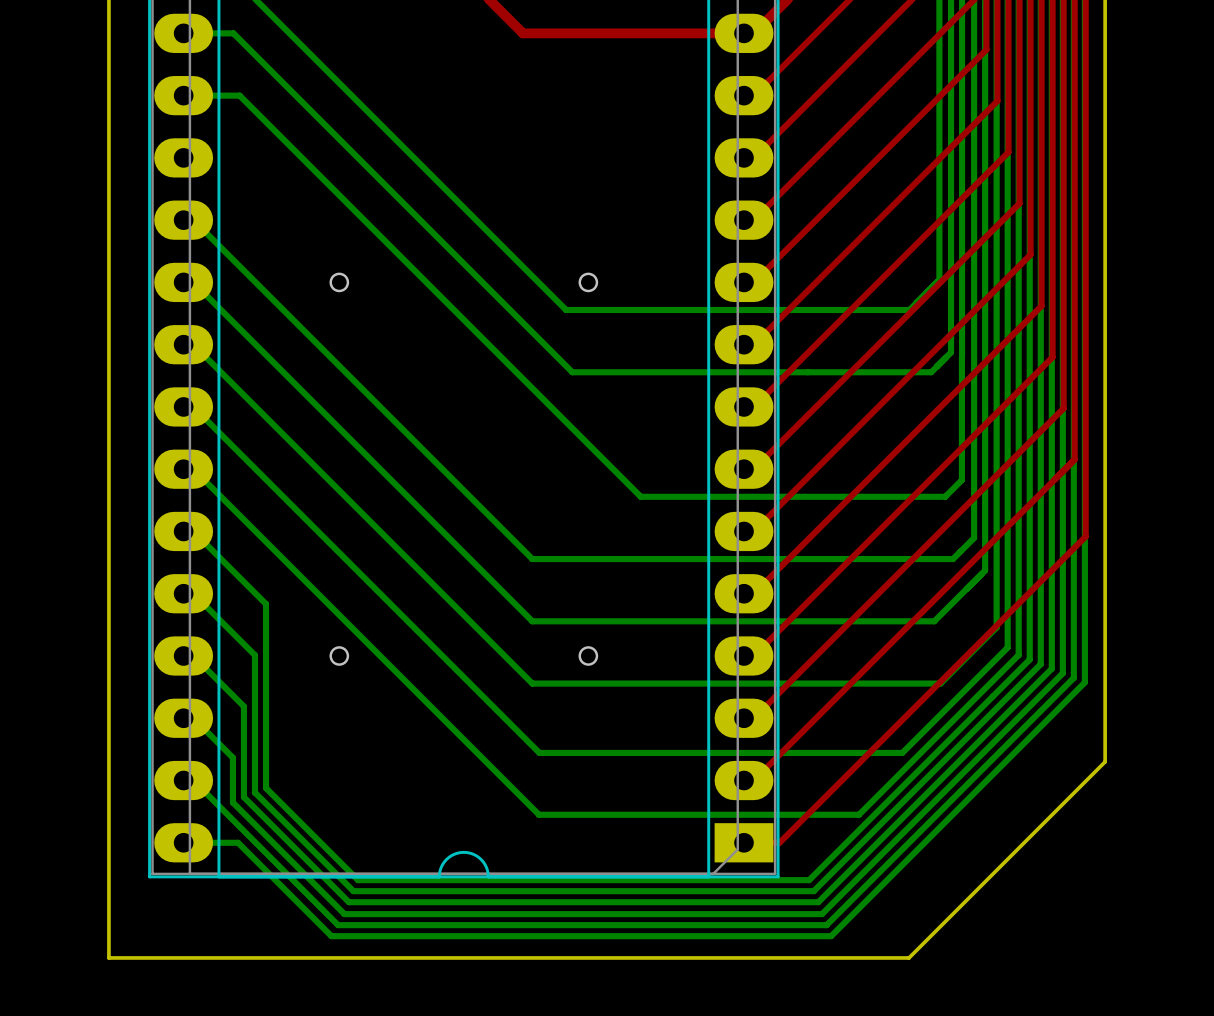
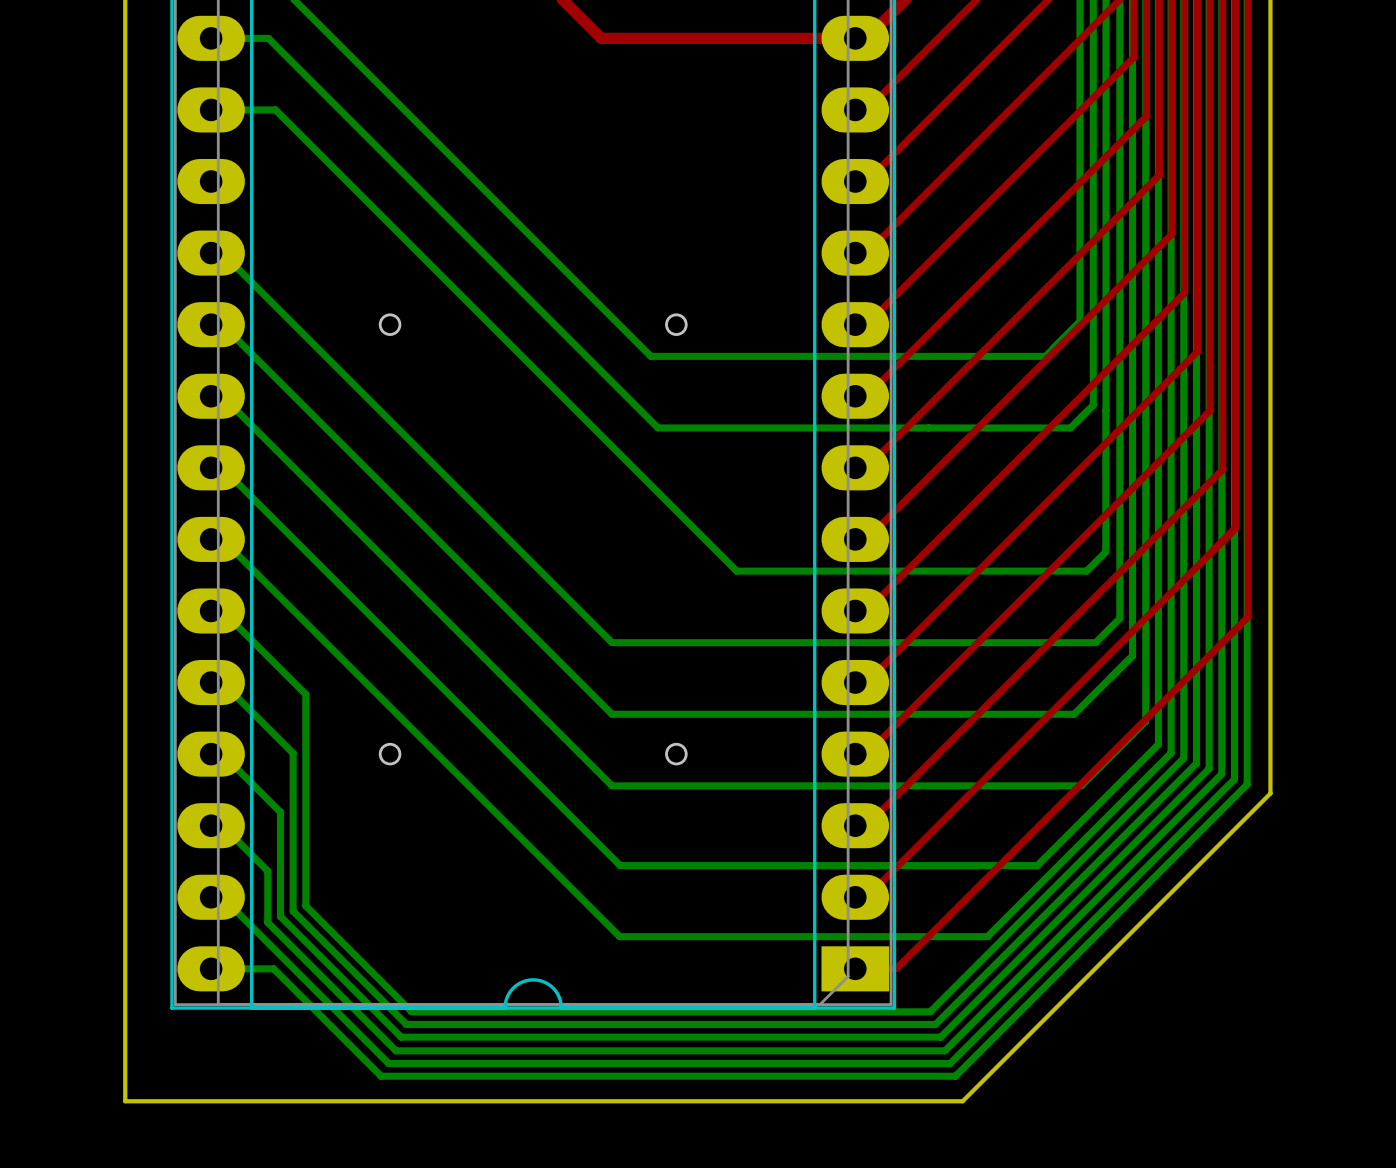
board edge: (1105, 690) (1105, 761) (909, 957) (837, 957) -> (1270, 793) (962, 1101)

